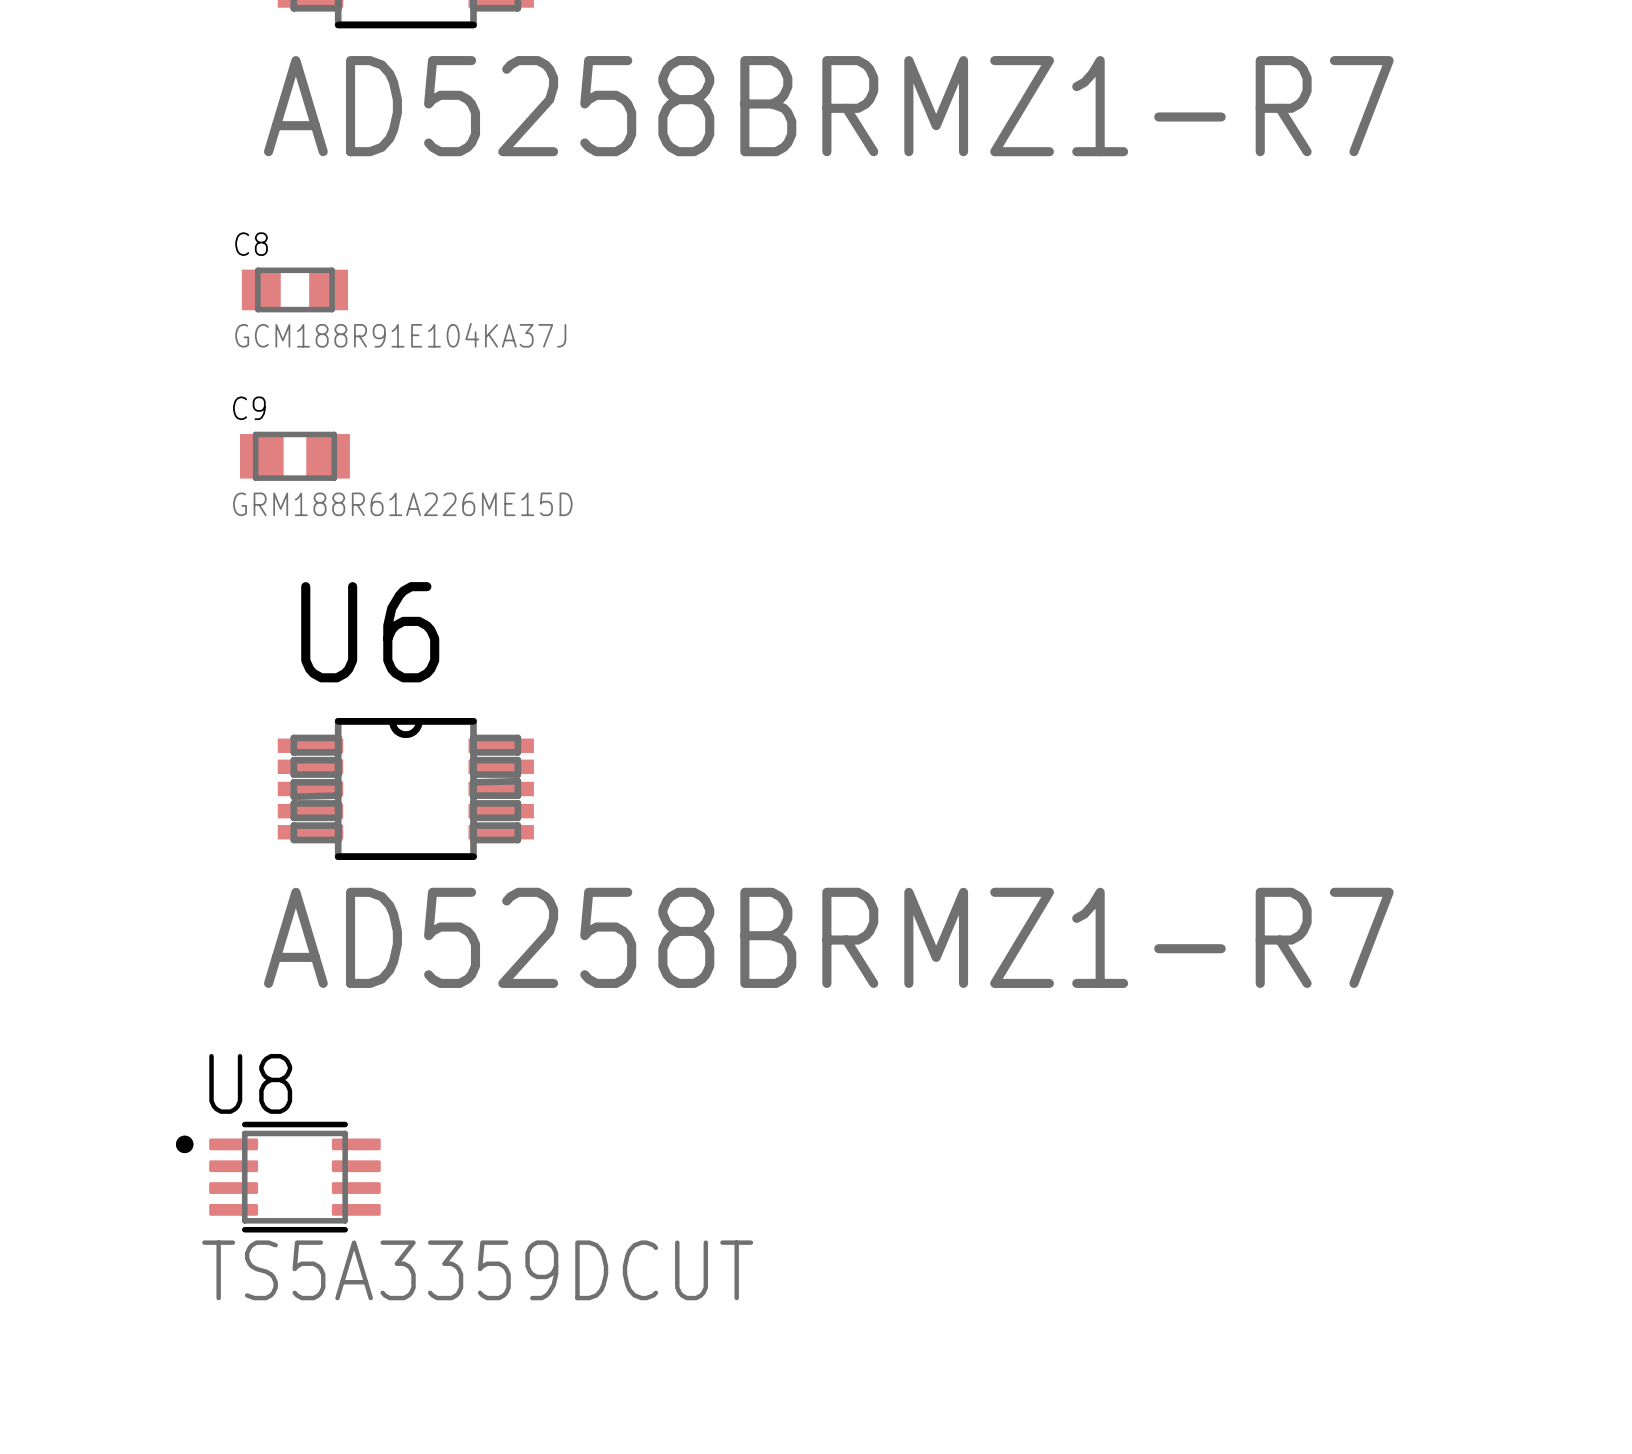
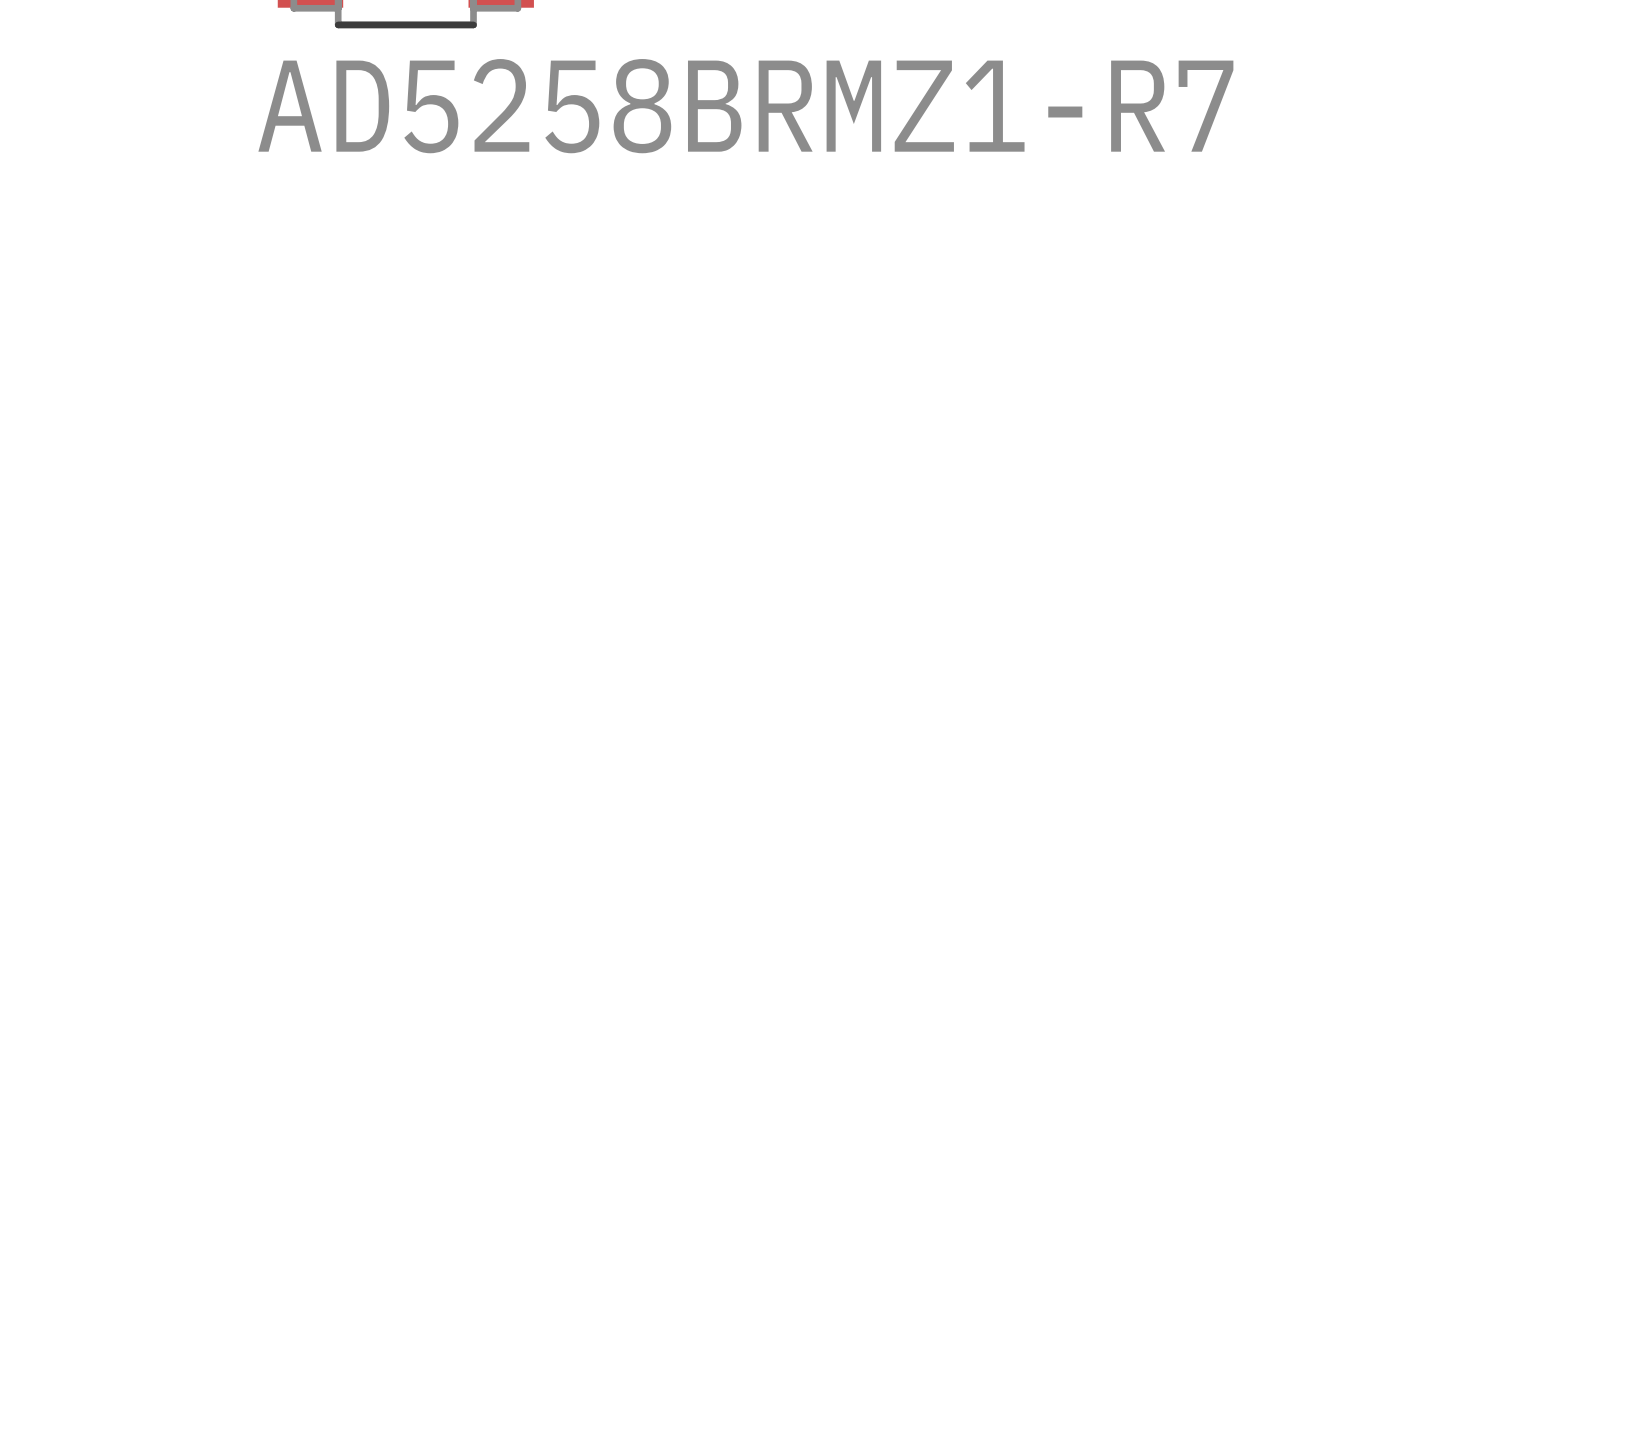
C8: GCM188R91E104KA37J (294, 289) -> none
C9: GRM188R61A226ME15D (294, 456) -> none
U6: AD5258BRMZ1-R7 (405, 788) -> none
U8: TS5A3359DCUT (278, 1177) -> none

